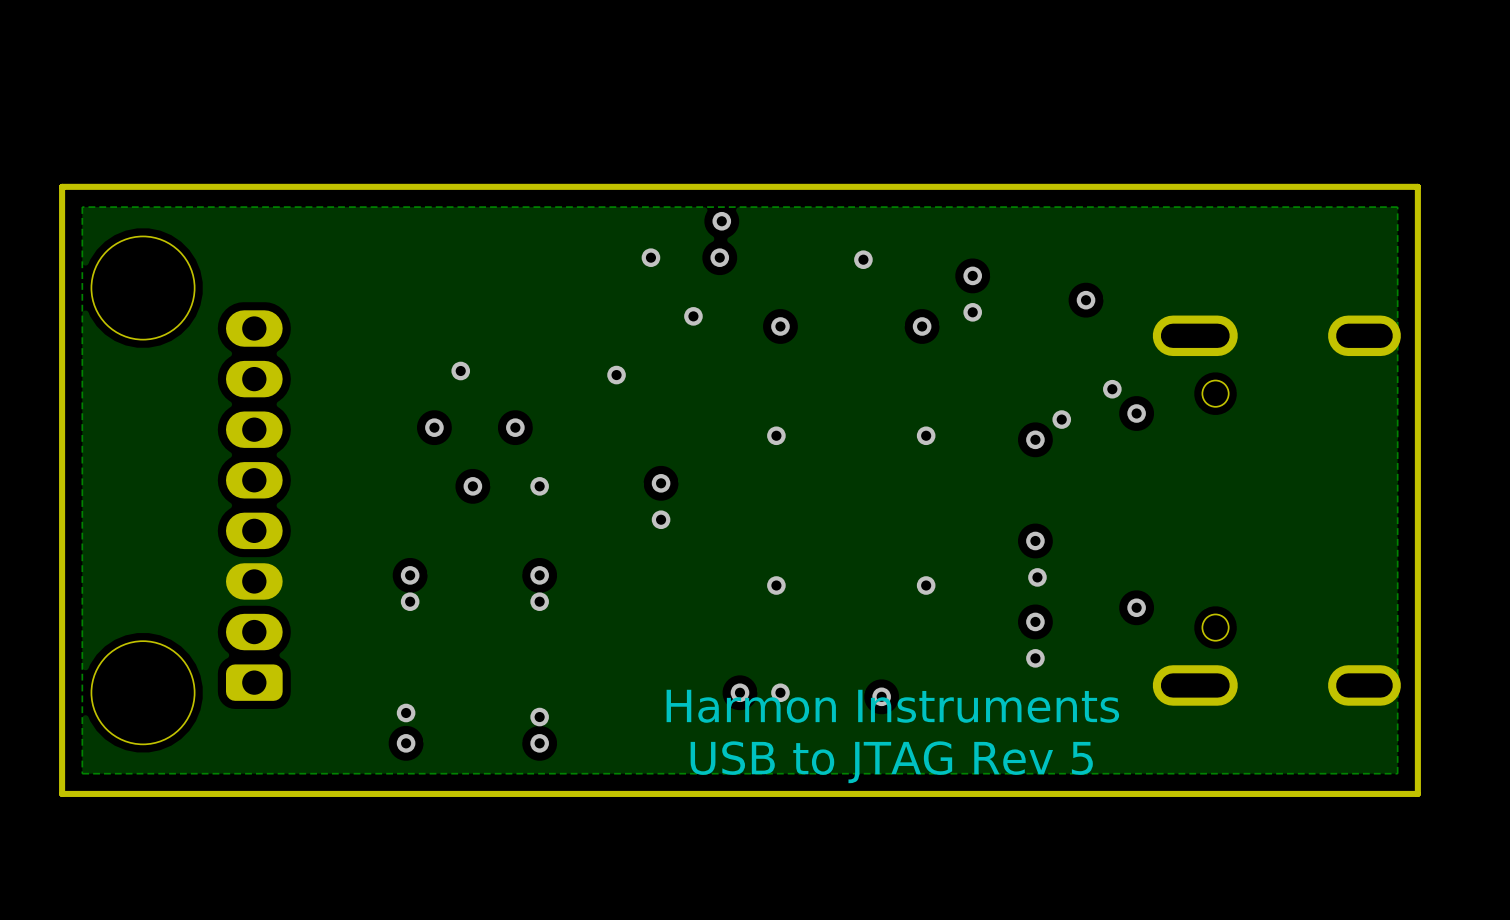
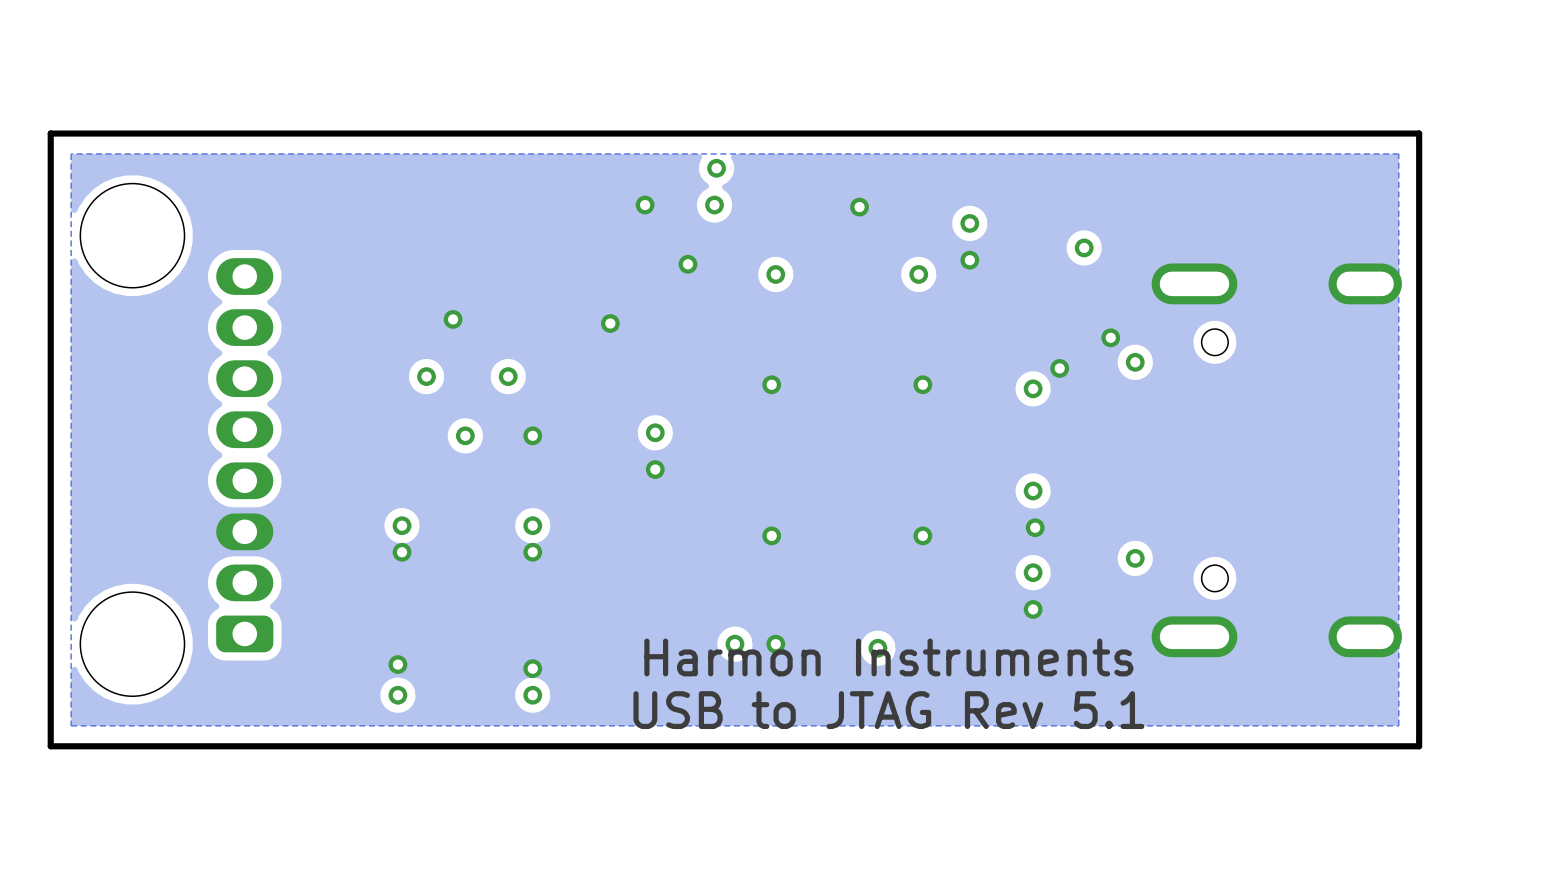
text: USB to JTAG Rev 5 (891, 762) -> USB to JTAG Rev 5.1 (888, 710)

